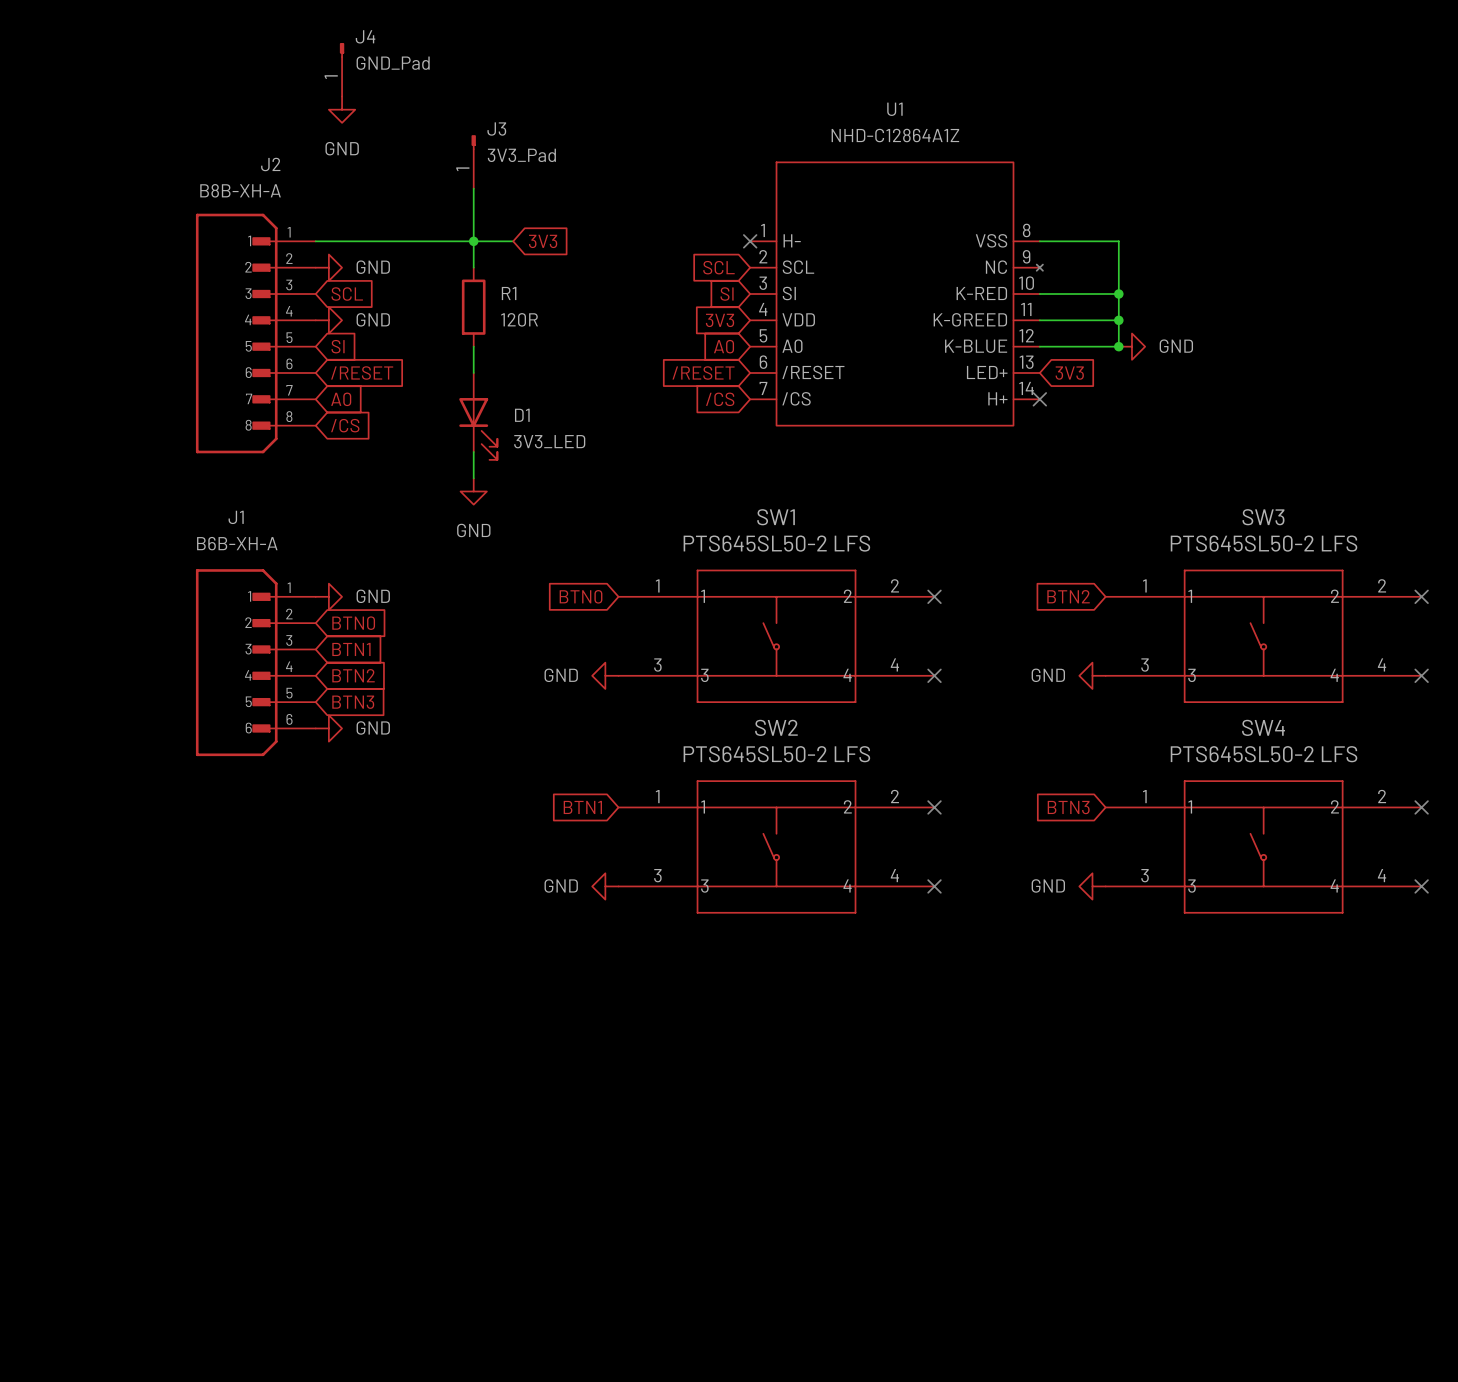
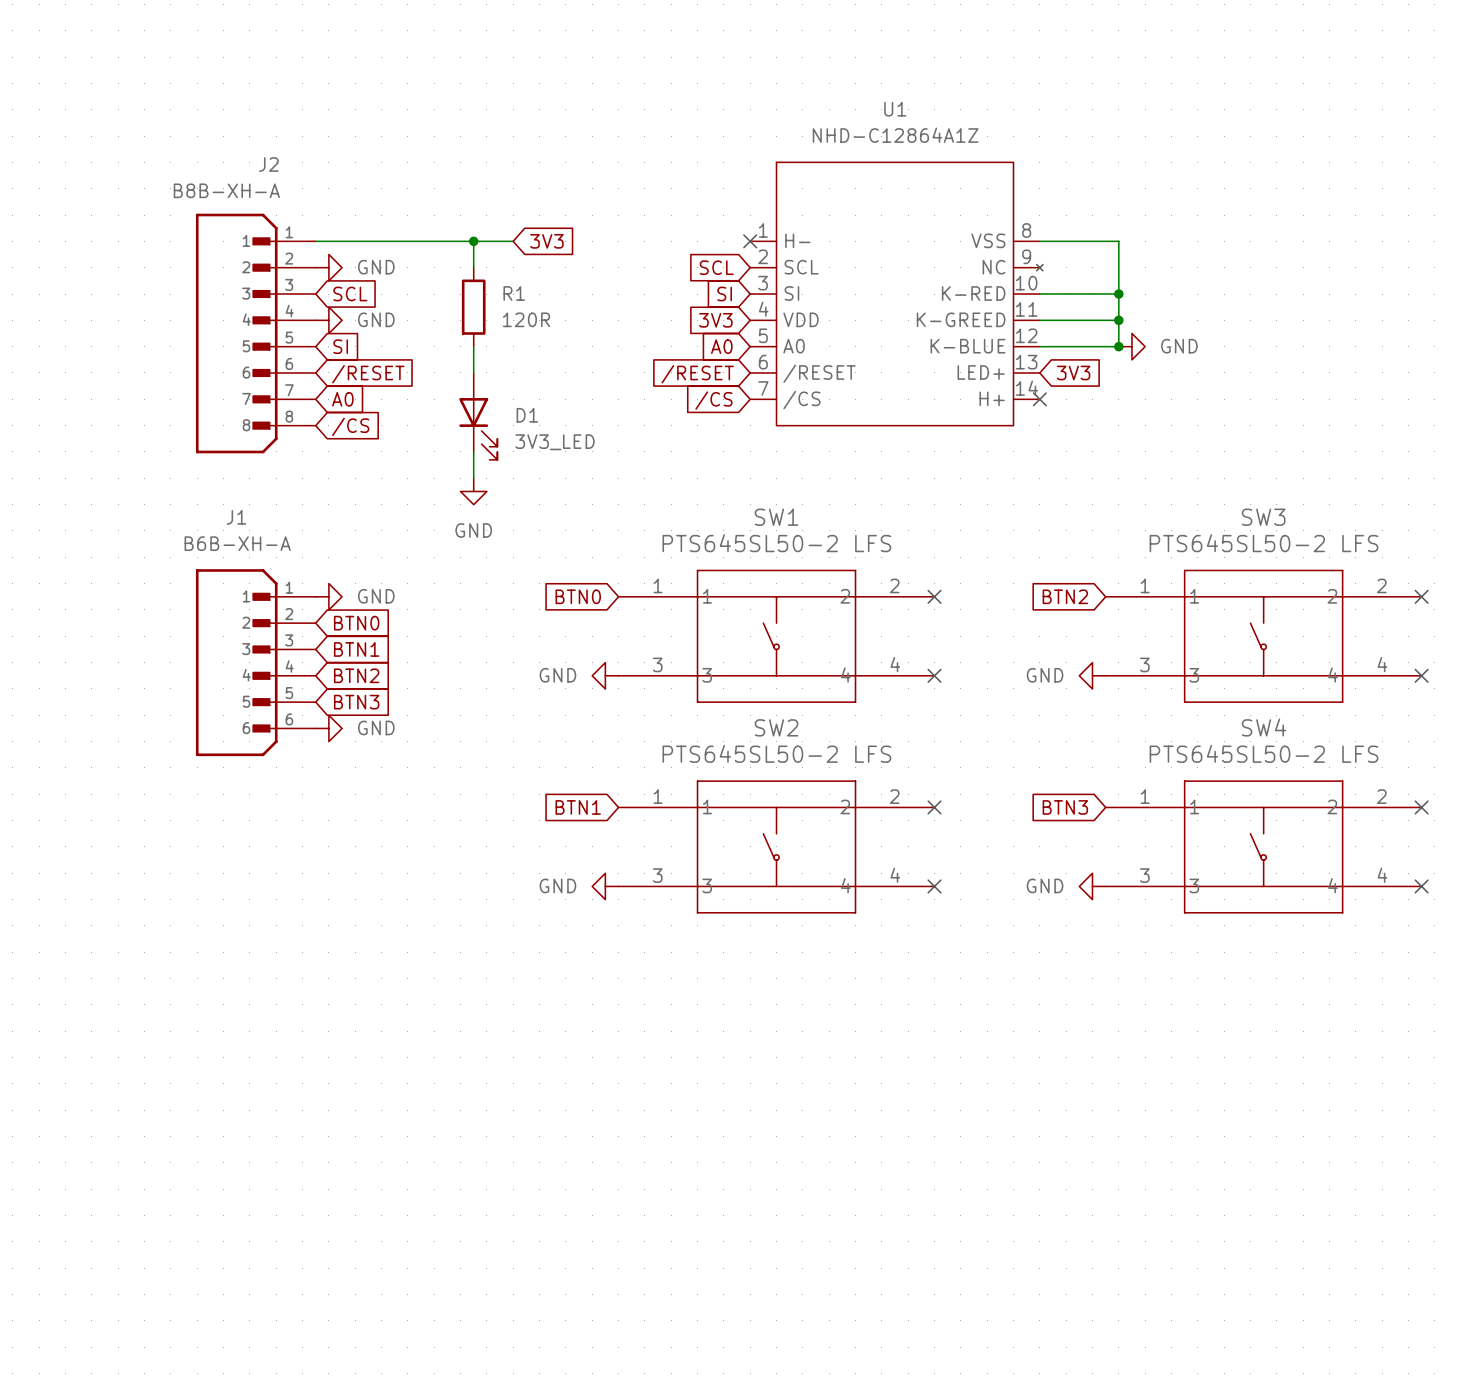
J4: GND_Pad (342, 69) -> none
power symbol: GND (342, 109) -> none
J3: 3V3_Pad (473, 161) -> none
wire: (473, 188) (473, 241) -> none

